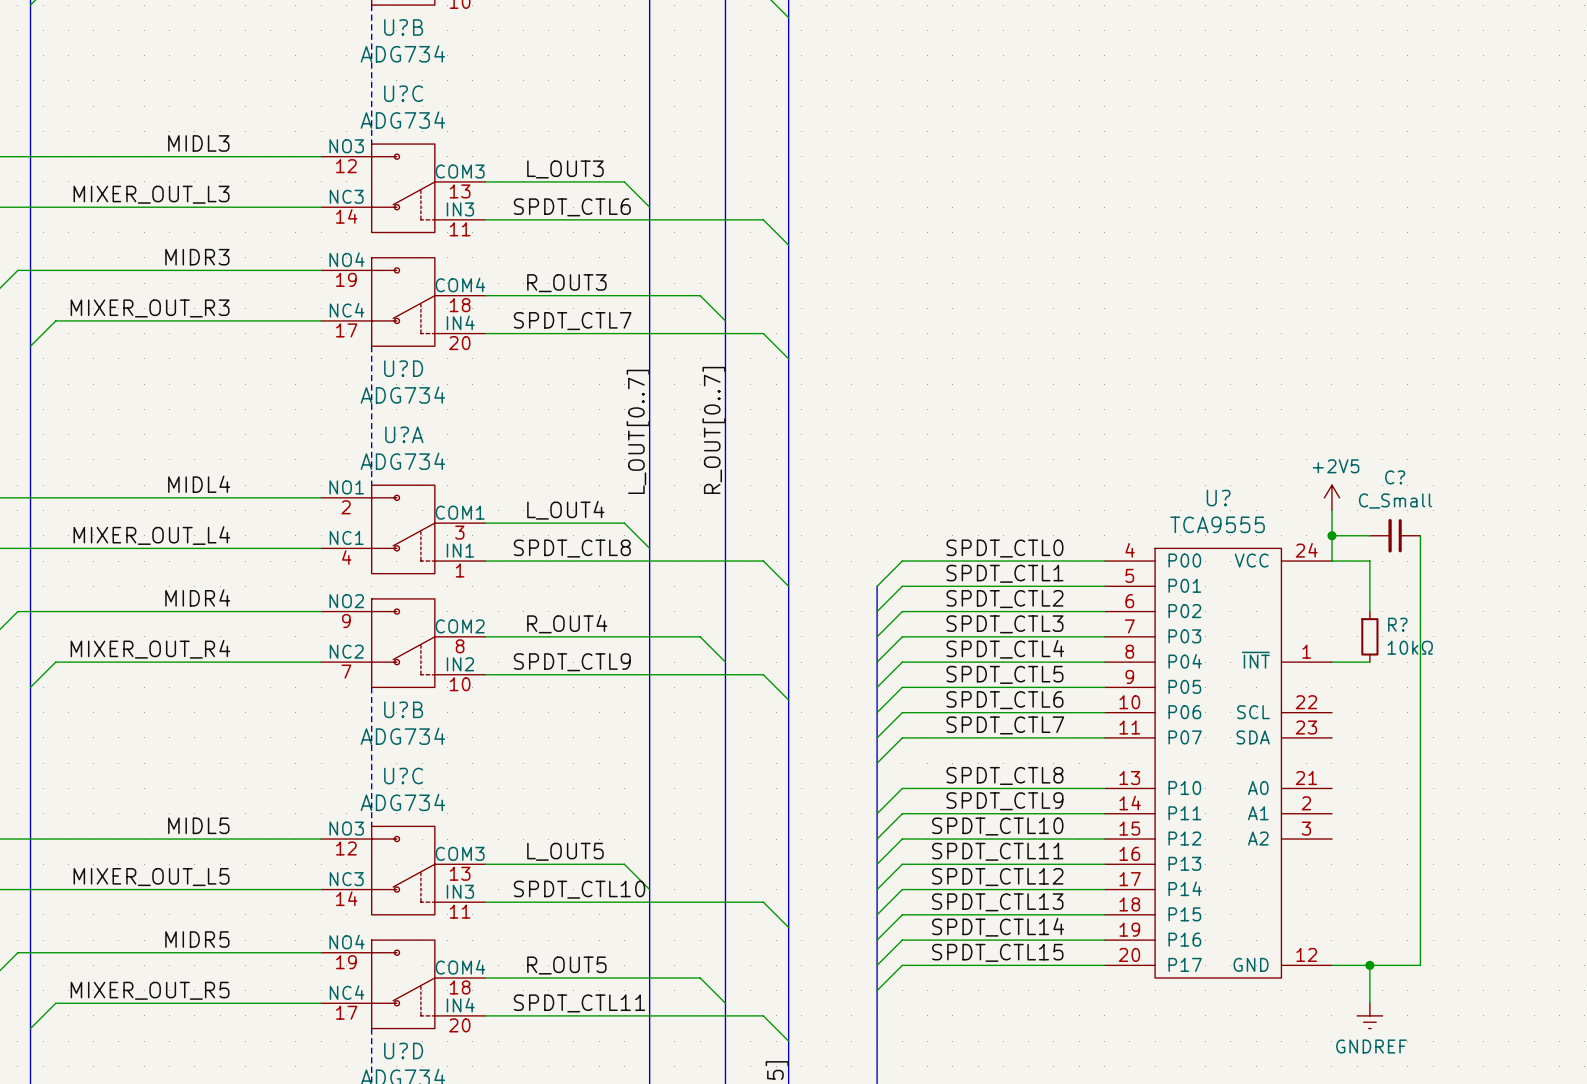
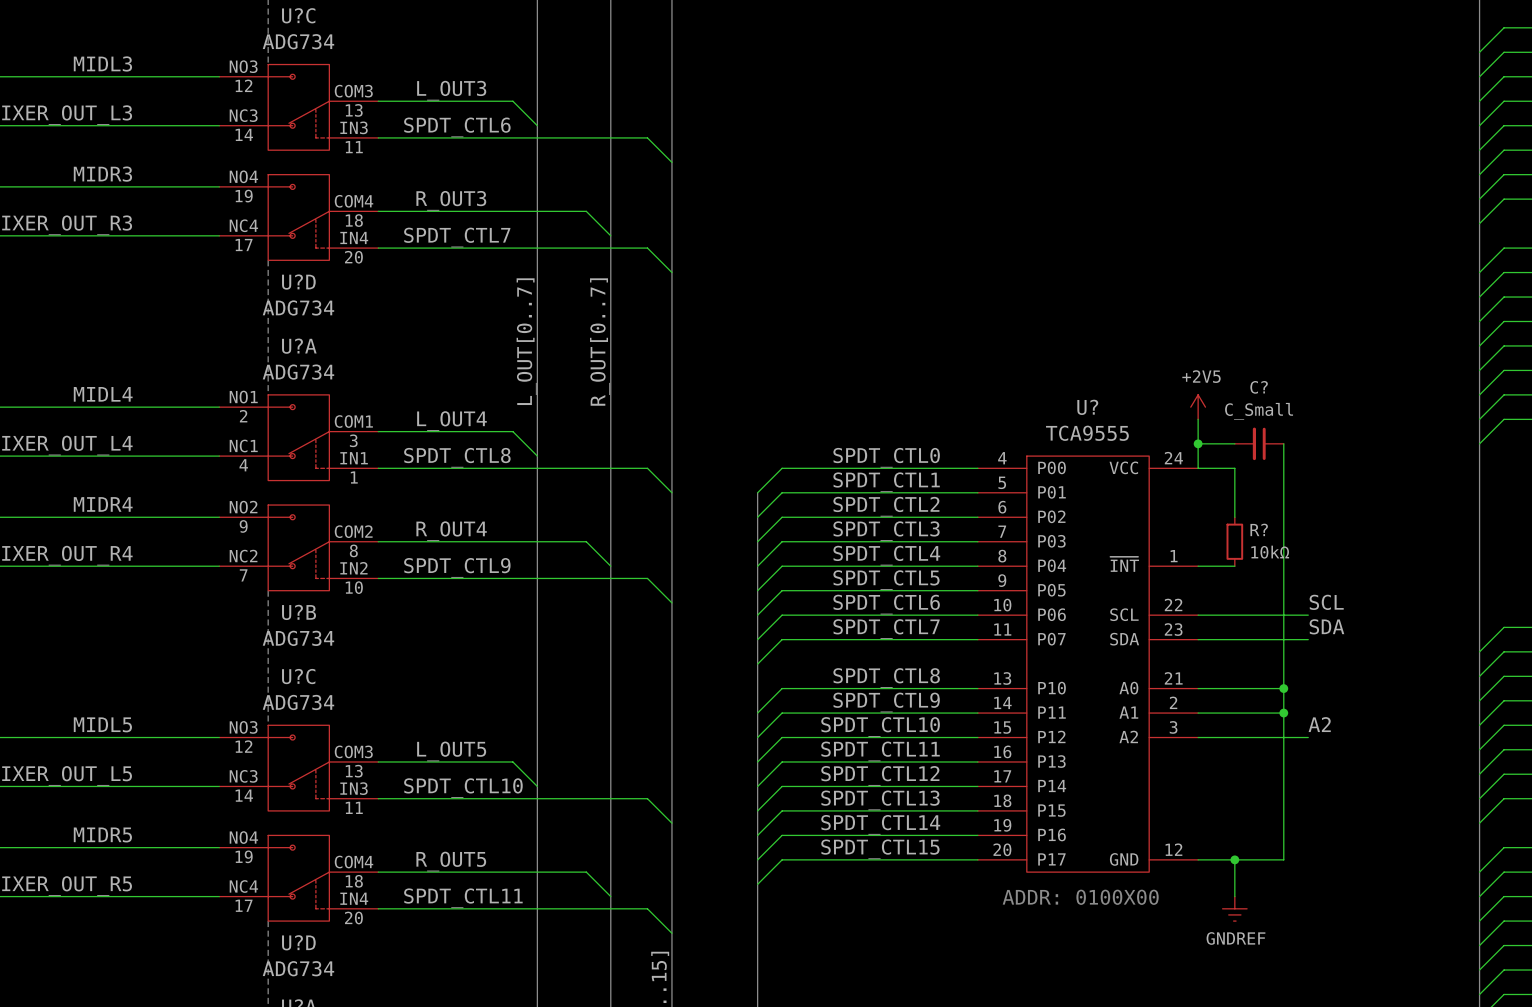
label: none -> SCL (1326, 602)
wire: none -> (1198, 615) (1308, 615)
label: none -> SDA (1326, 626)
wire: none -> (1198, 639) (1308, 639)
wire: none -> (1198, 688) (1283, 688)
junction: none -> (1283, 688)
wire: none -> (1198, 713) (1283, 713)
junction: none -> (1283, 713)
label: none -> A2 (1319, 724)
wire: none -> (1198, 737) (1308, 737)
text: none -> ADDR: 0100X00 (1080, 897)

